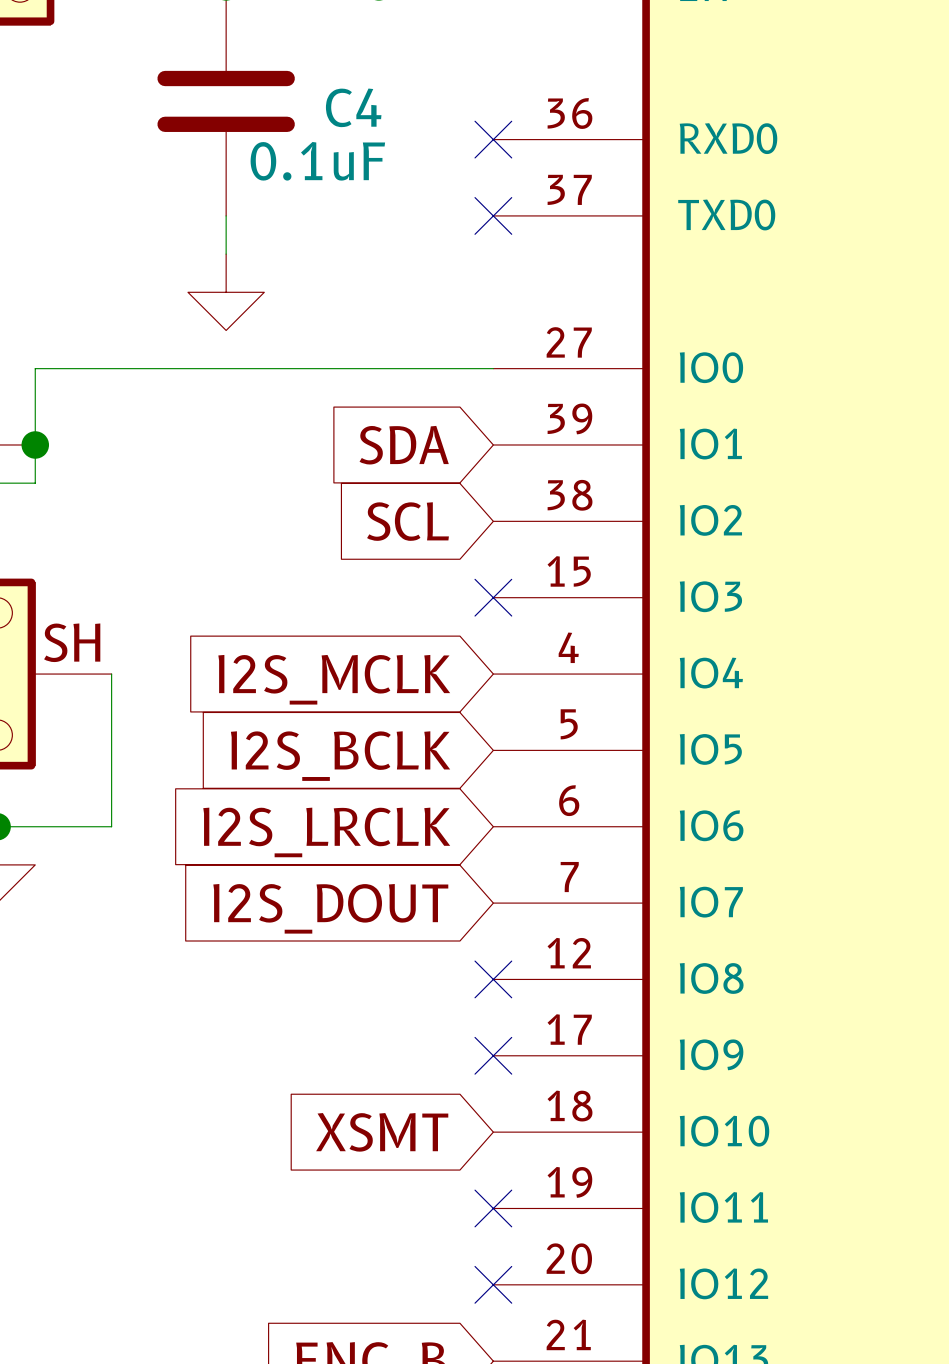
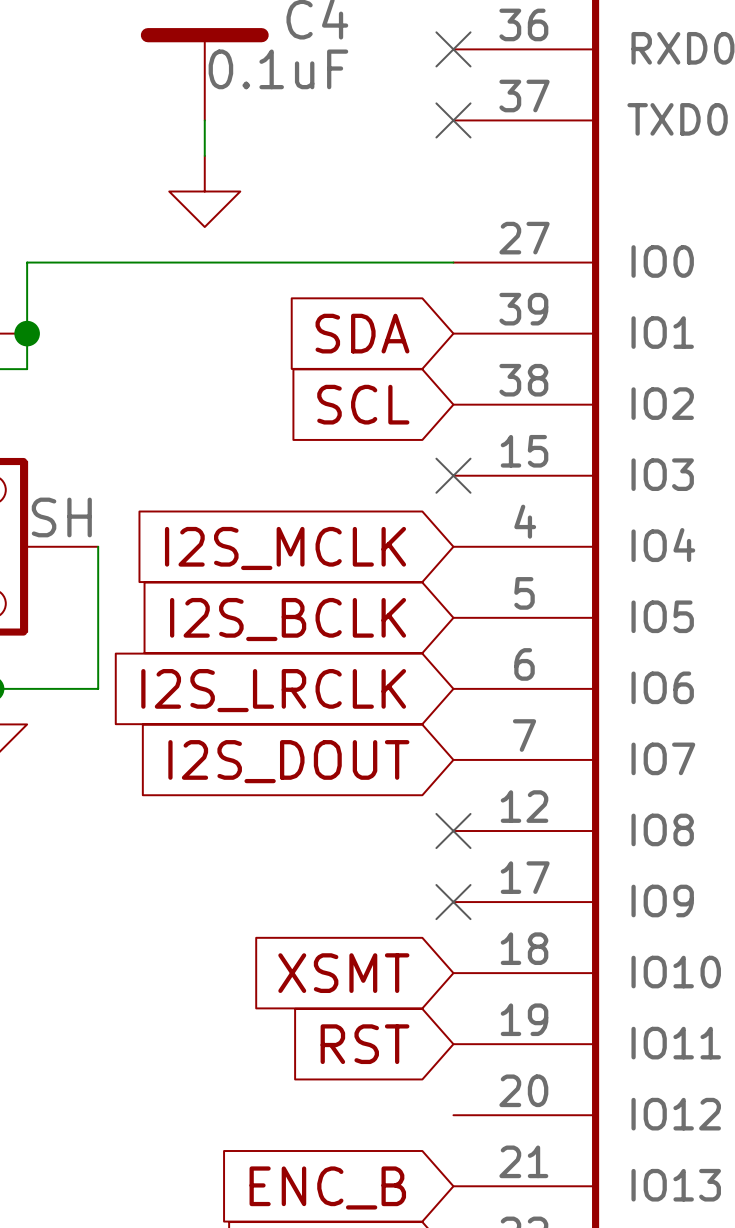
global label: none -> RST (365, 1044)
no-connect mark: (493, 1208) -> none
no-connect mark: (493, 1284) -> none

